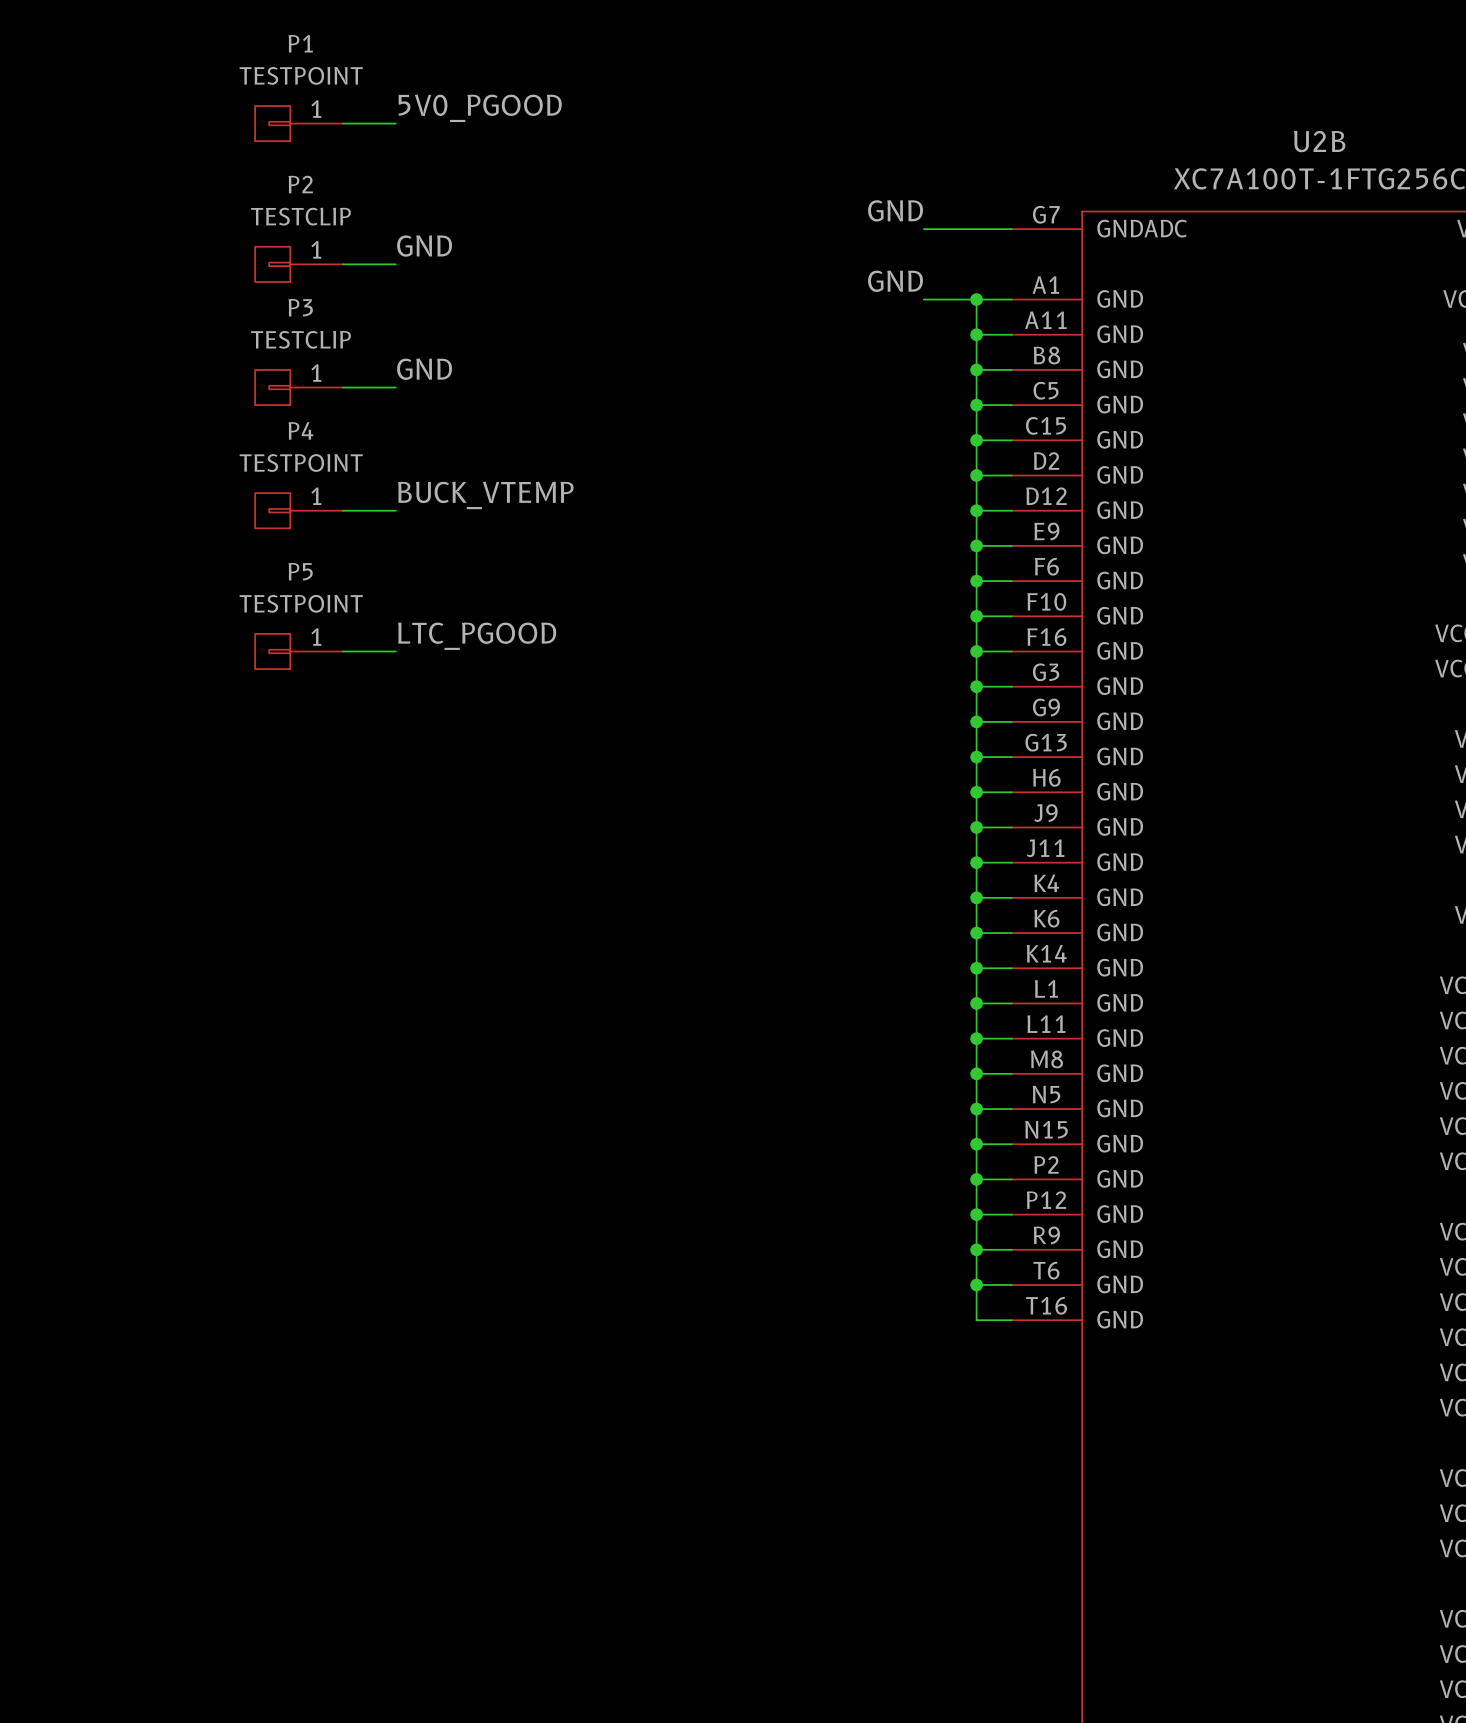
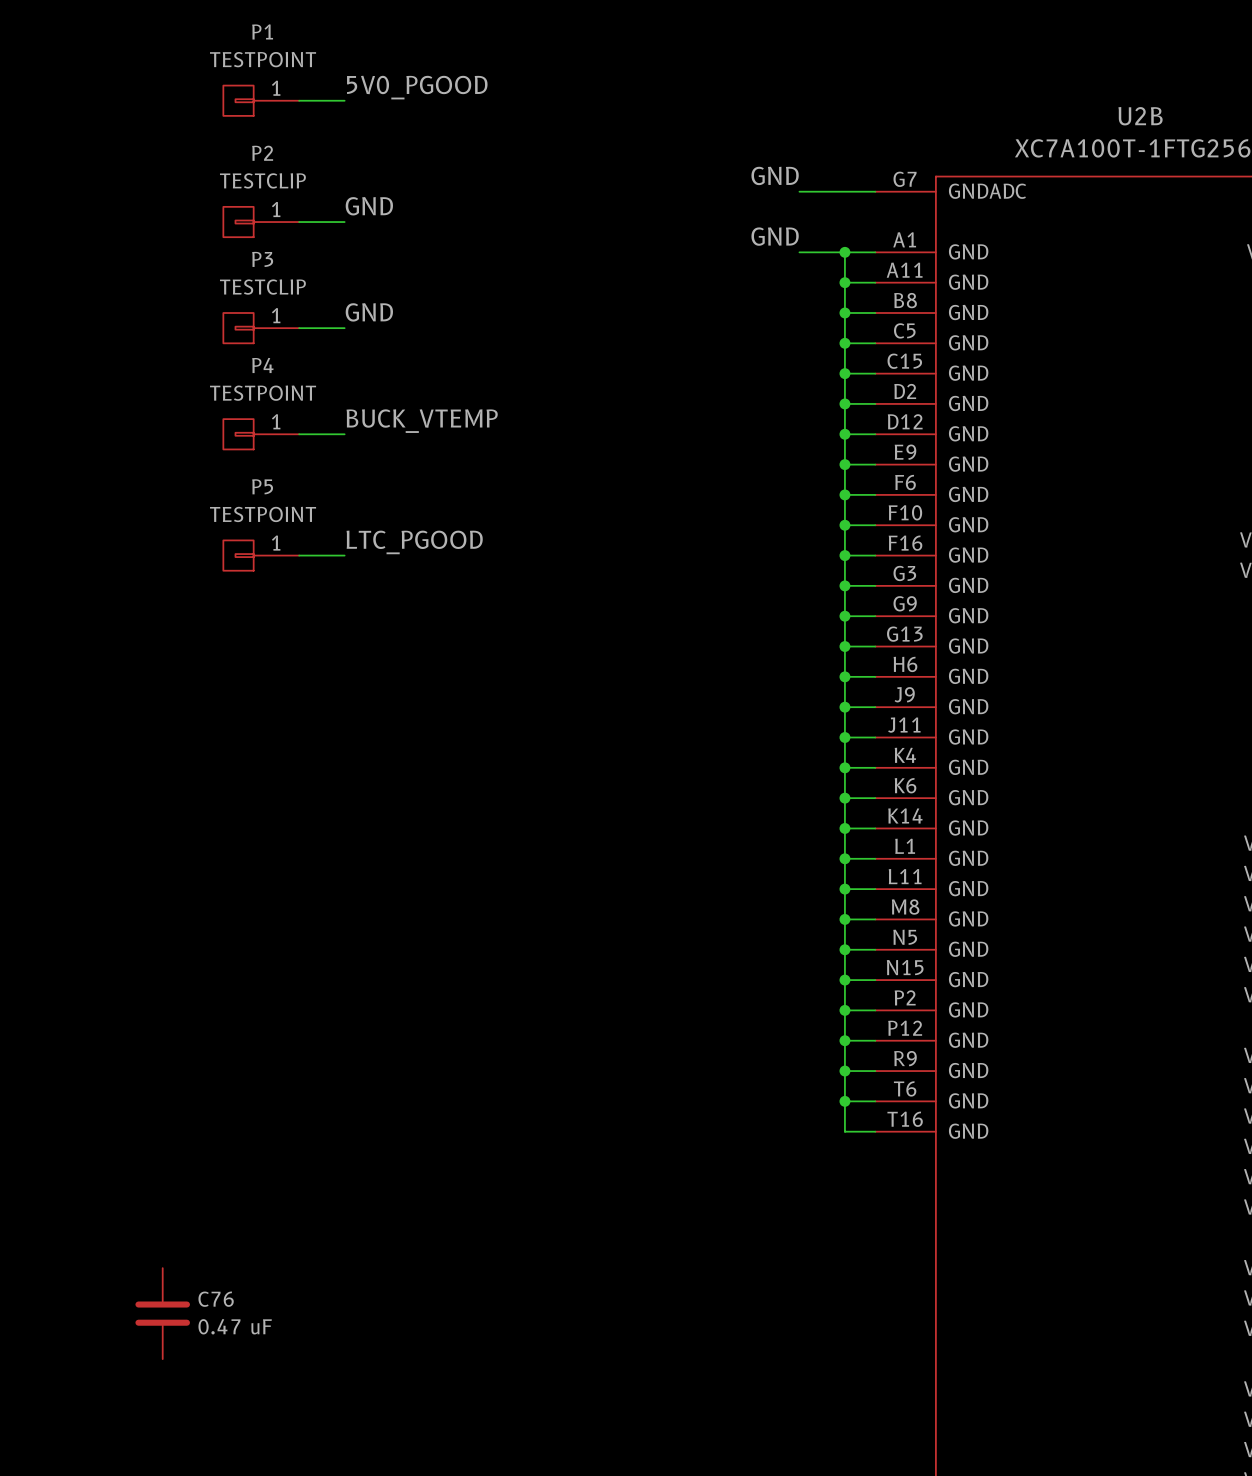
C76: none -> 0.47 uF (162, 1313)

